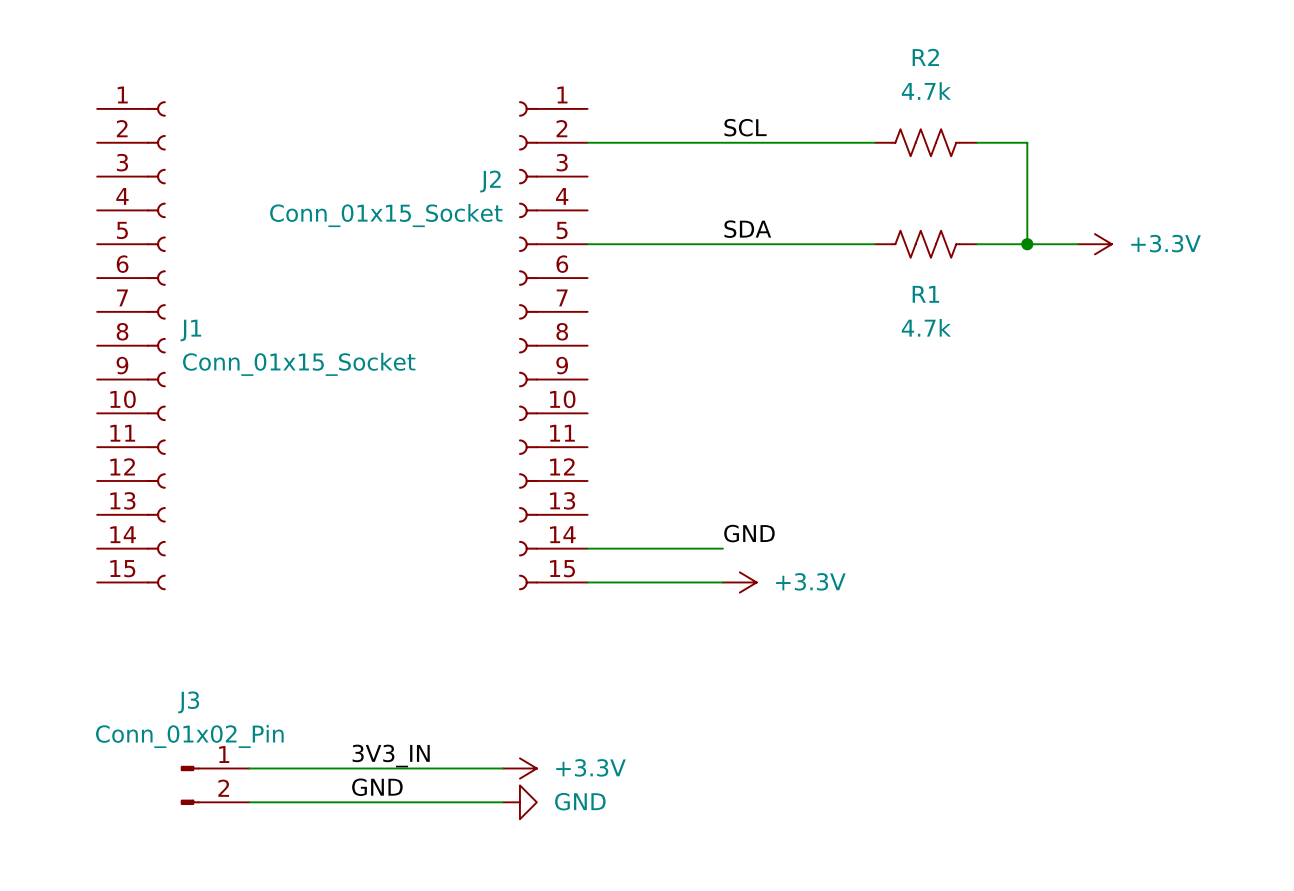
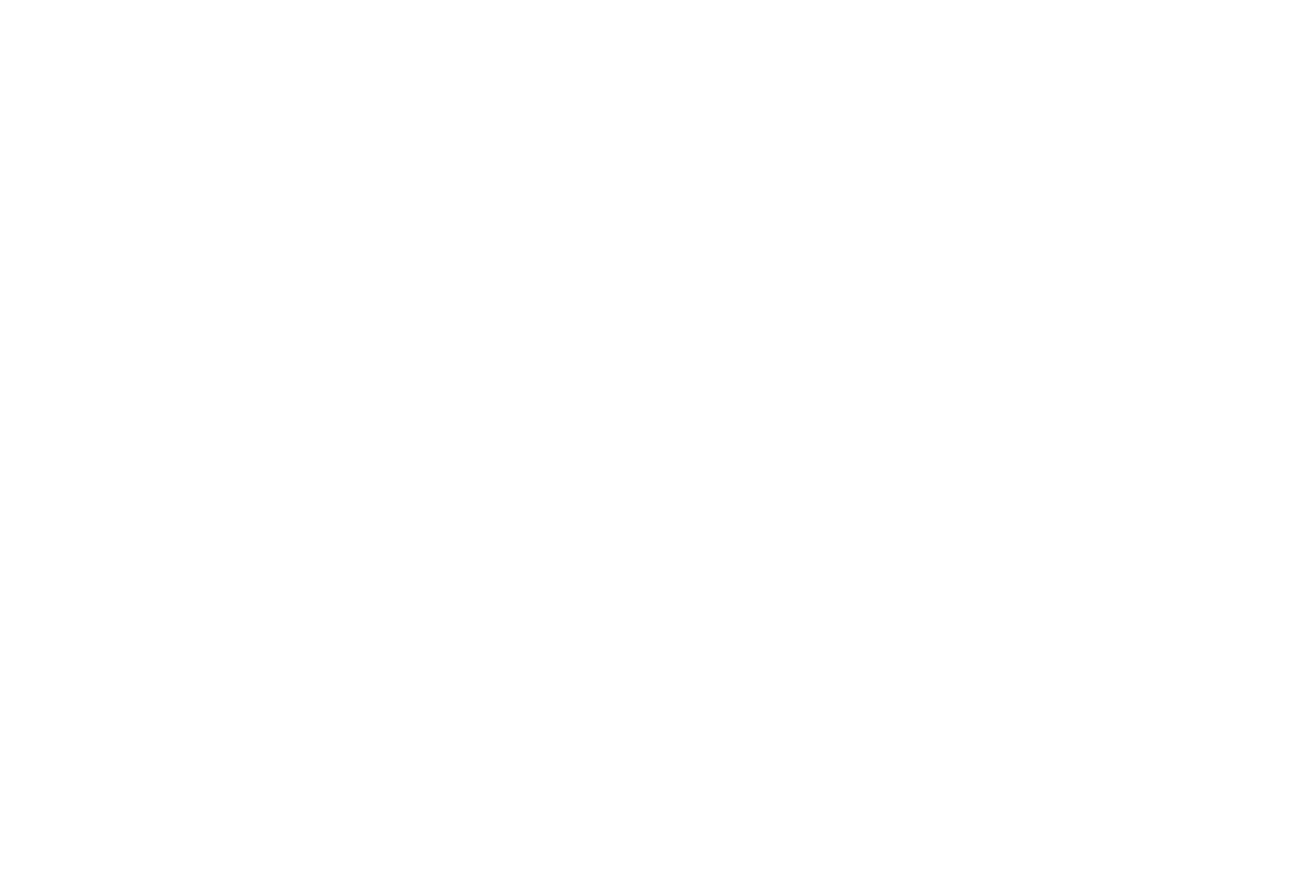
label: SCL (745, 127) -> none
wire: (587, 142) (875, 142) -> none
R2: 4.7k (925, 142) -> none
wire: (976, 142) (1027, 142) (1027, 244) -> none
label: SDA (747, 229) -> none
wire: (587, 244) (875, 244) -> none
R1: 4.7k (925, 244) -> none
wire: (976, 244) (1078, 244) -> none
junction: (1027, 244) -> none
power symbol: +3.3V (1094, 244) -> none
J1: Conn_01x15_Socket (131, 345) -> none
J2: Conn_01x15_Socket (553, 345) -> none
label: GND (749, 533) -> none
wire: (587, 548) (722, 548) -> none
wire: (587, 582) (722, 582) -> none
power symbol: +3.3V (739, 582) -> none
label: 3V3_IN (391, 755) -> none
wire: (249, 768) (503, 768) -> none
power symbol: +3.3V (519, 768) -> none
J3: Conn_01x02_Pin (215, 785) -> none
label: GND (377, 787) -> none
wire: (249, 802) (503, 802) -> none
power symbol: GND (519, 802) -> none

